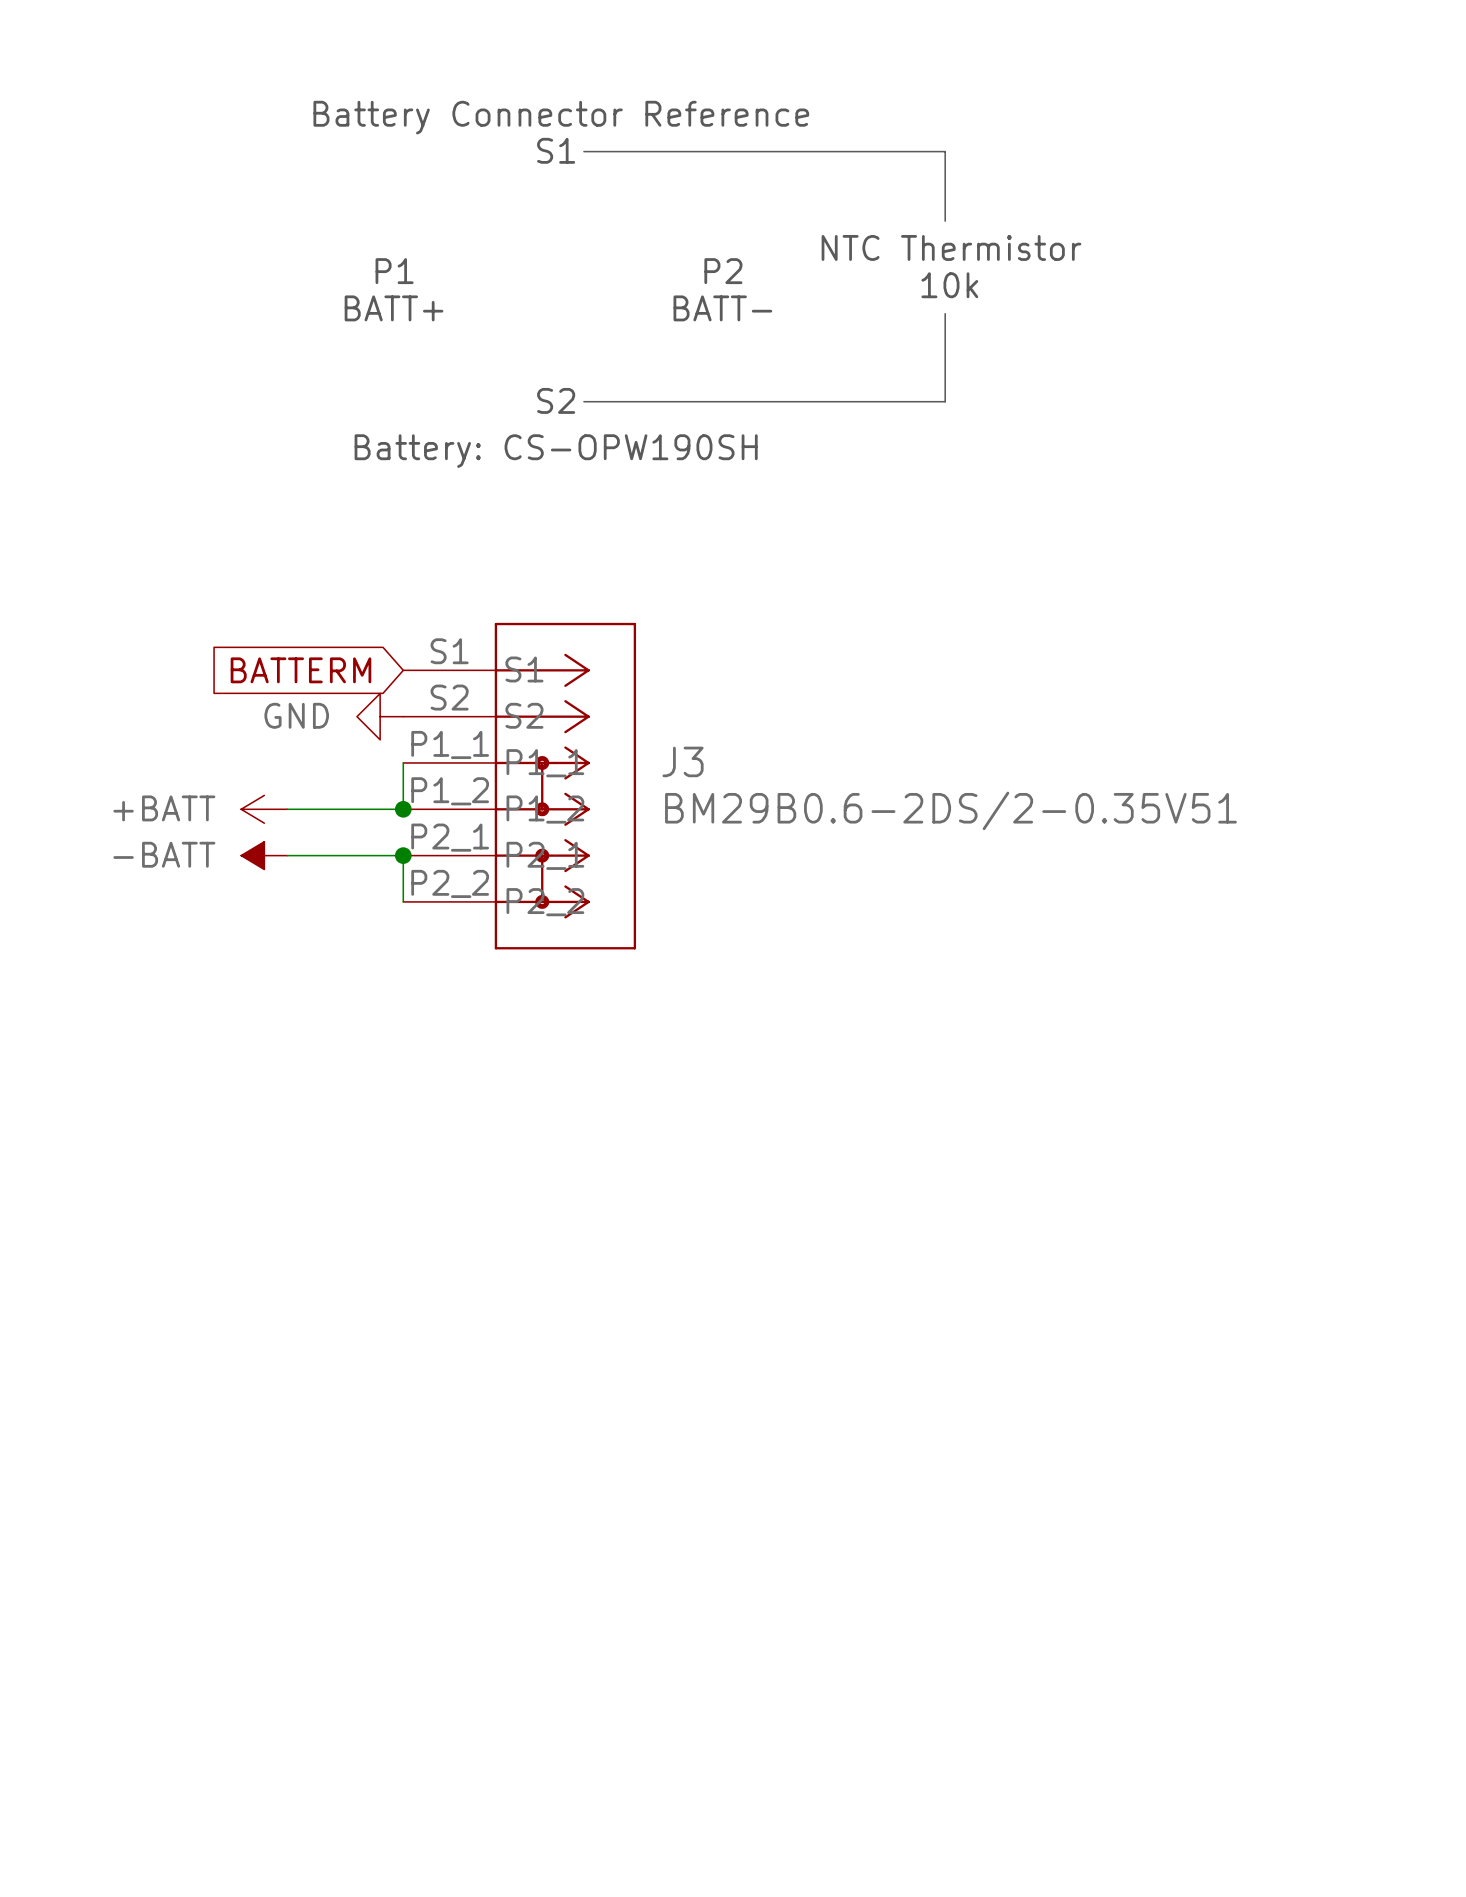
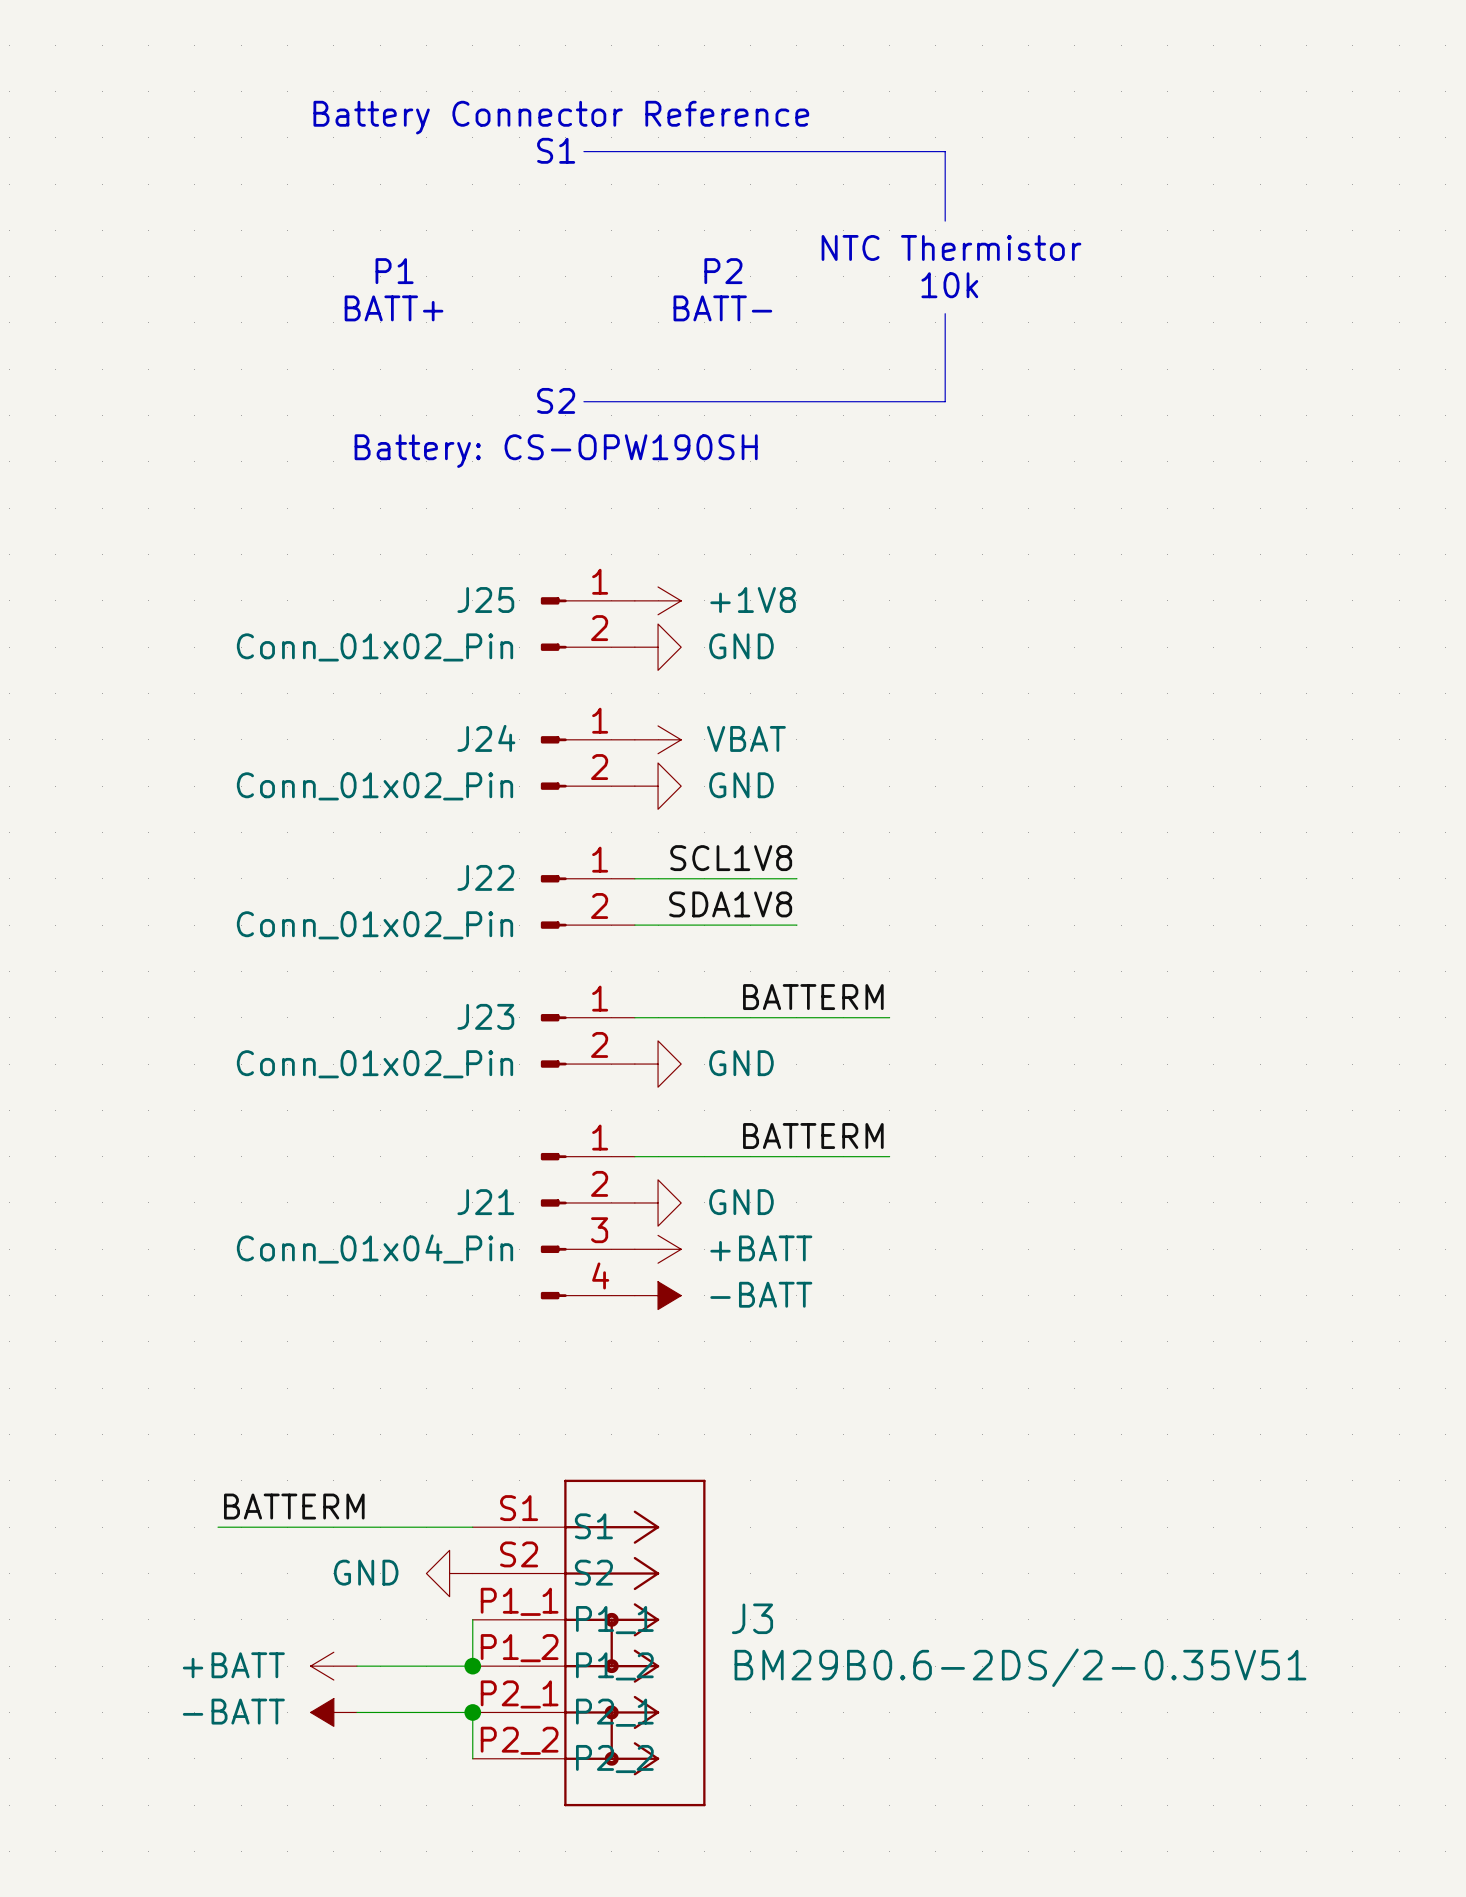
power symbol: none -> +1V8 (658, 600)
J25: none -> Conn_01x02_Pin (587, 624)
power symbol: none -> GND (658, 647)
global label: BATTERM (300, 670) -> none
power symbol: GND (380, 716) -> none
power symbol: none -> VBAT (658, 739)
wire: (403, 762) (403, 809) (287, 809) -> none
J24: none -> Conn_01x02_Pin (587, 762)
J3 position: (519, 786) -> (589, 1642)
power symbol: none -> GND (658, 786)
power symbol: +BATT (264, 809) -> none
junction: (403, 809) -> none
power symbol: -BATT (264, 855) -> none
wire: (287, 855) (403, 855) (403, 901) -> none
junction: (403, 855) -> none
label: none -> SCL1V8 (731, 858)
wire: none -> (634, 878) (796, 878)
J22: none -> Conn_01x02_Pin (587, 901)
label: none -> SDA1V8 (730, 904)
wire: none -> (634, 925) (796, 925)
label: none -> BATTERM (813, 997)
wire: none -> (634, 1017) (889, 1017)
J23: none -> Conn_01x02_Pin (587, 1040)
power symbol: none -> GND (658, 1064)
label: none -> BATTERM (813, 1136)
wire: none -> (634, 1156) (889, 1156)
power symbol: none -> GND (658, 1202)
J21: none -> Conn_01x04_Pin (587, 1226)
power symbol: none -> +BATT (658, 1249)
power symbol: none -> -BATT (658, 1295)
label: none -> BATTERM (294, 1506)
wire: none -> (218, 1527) (472, 1527)
power symbol: none -> GND (449, 1573)
wire: none -> (472, 1619) (472, 1666) (356, 1666)
power symbol: none -> +BATT (333, 1666)
junction: none -> (472, 1666)
power symbol: none -> -BATT (333, 1712)
wire: none -> (356, 1712) (472, 1712) (472, 1758)
junction: none -> (472, 1712)

